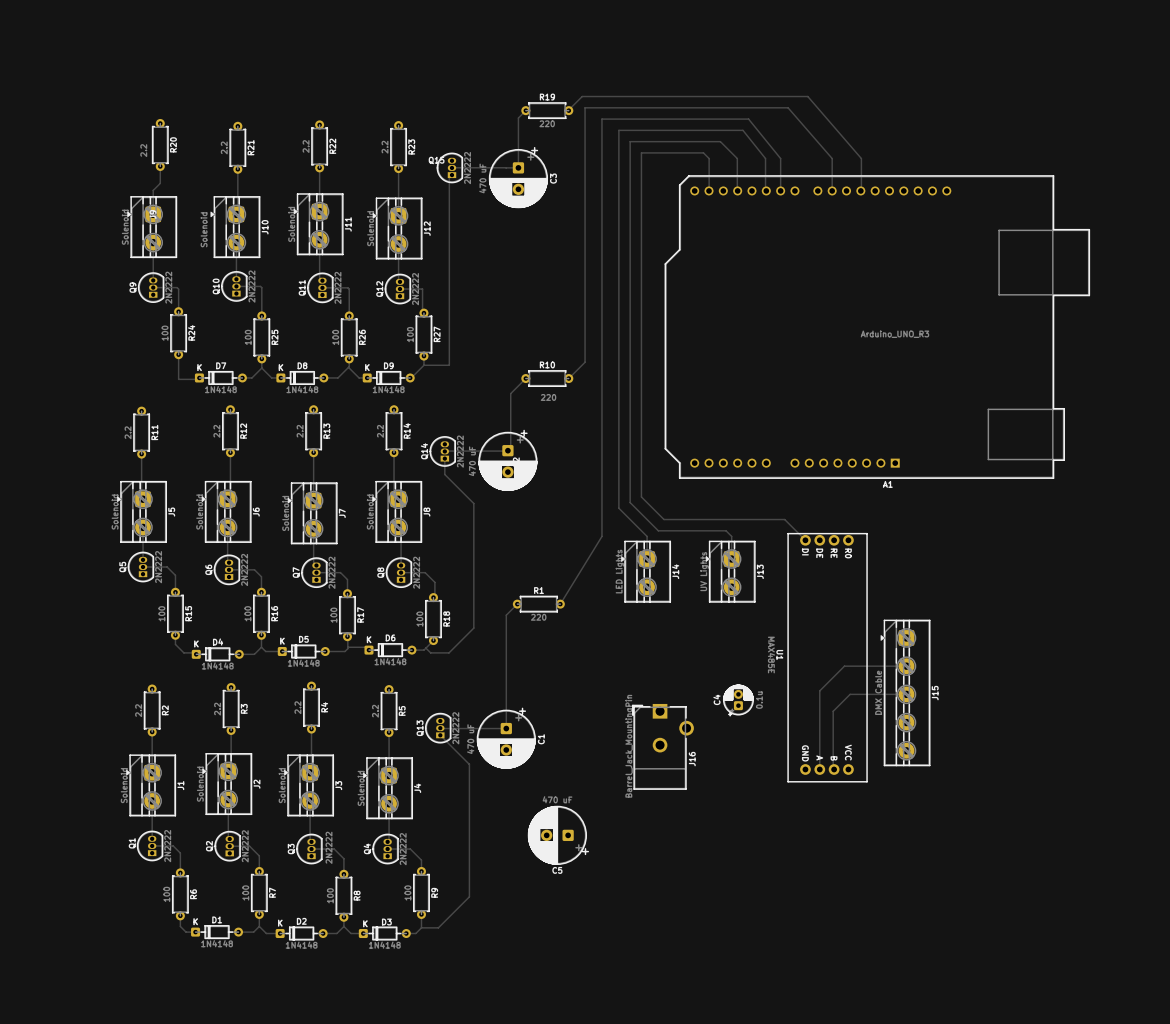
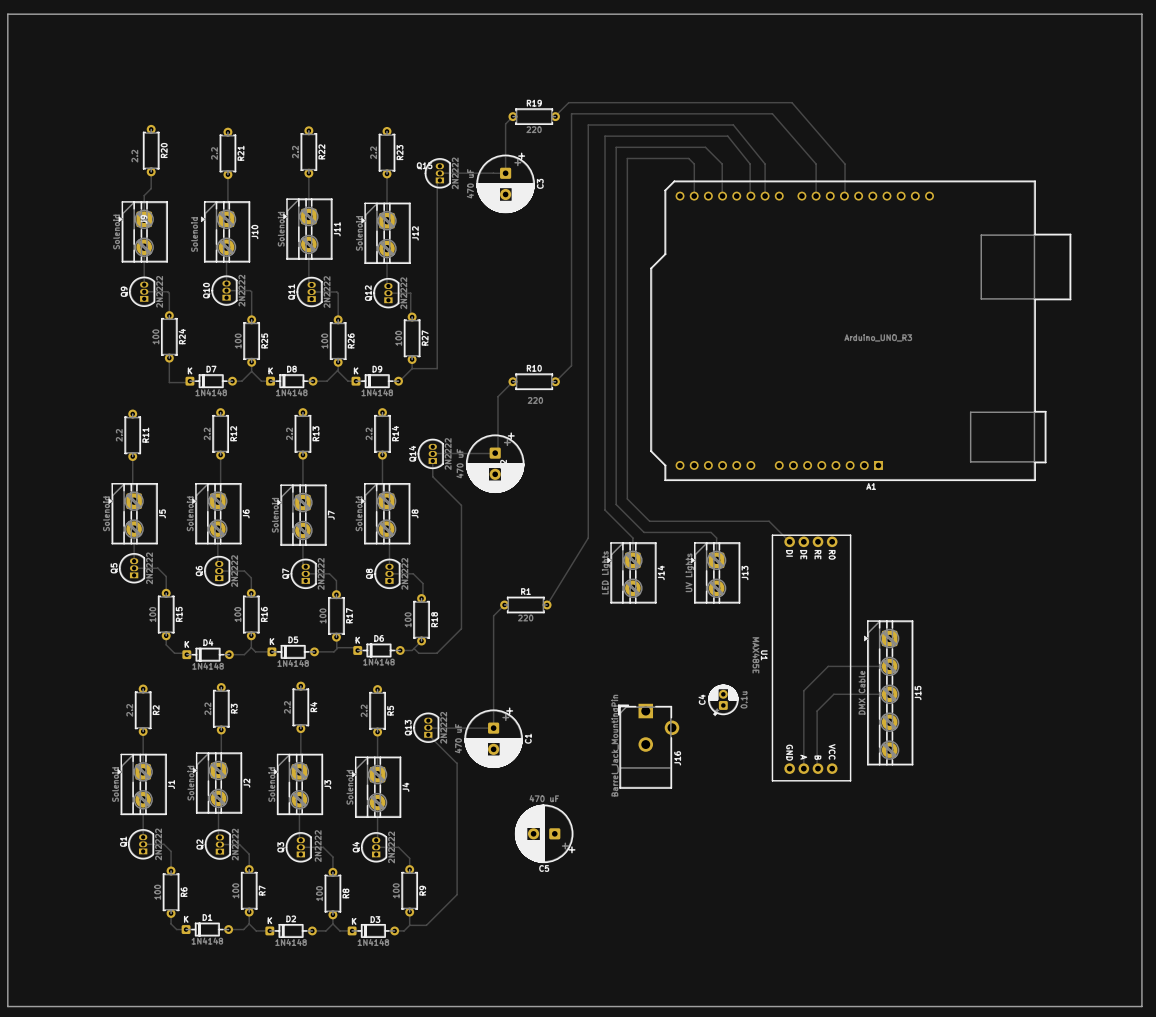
board edge: none -> (7, 14) (1141, 14) (1141, 1006) (7, 1006) (7, 14)

